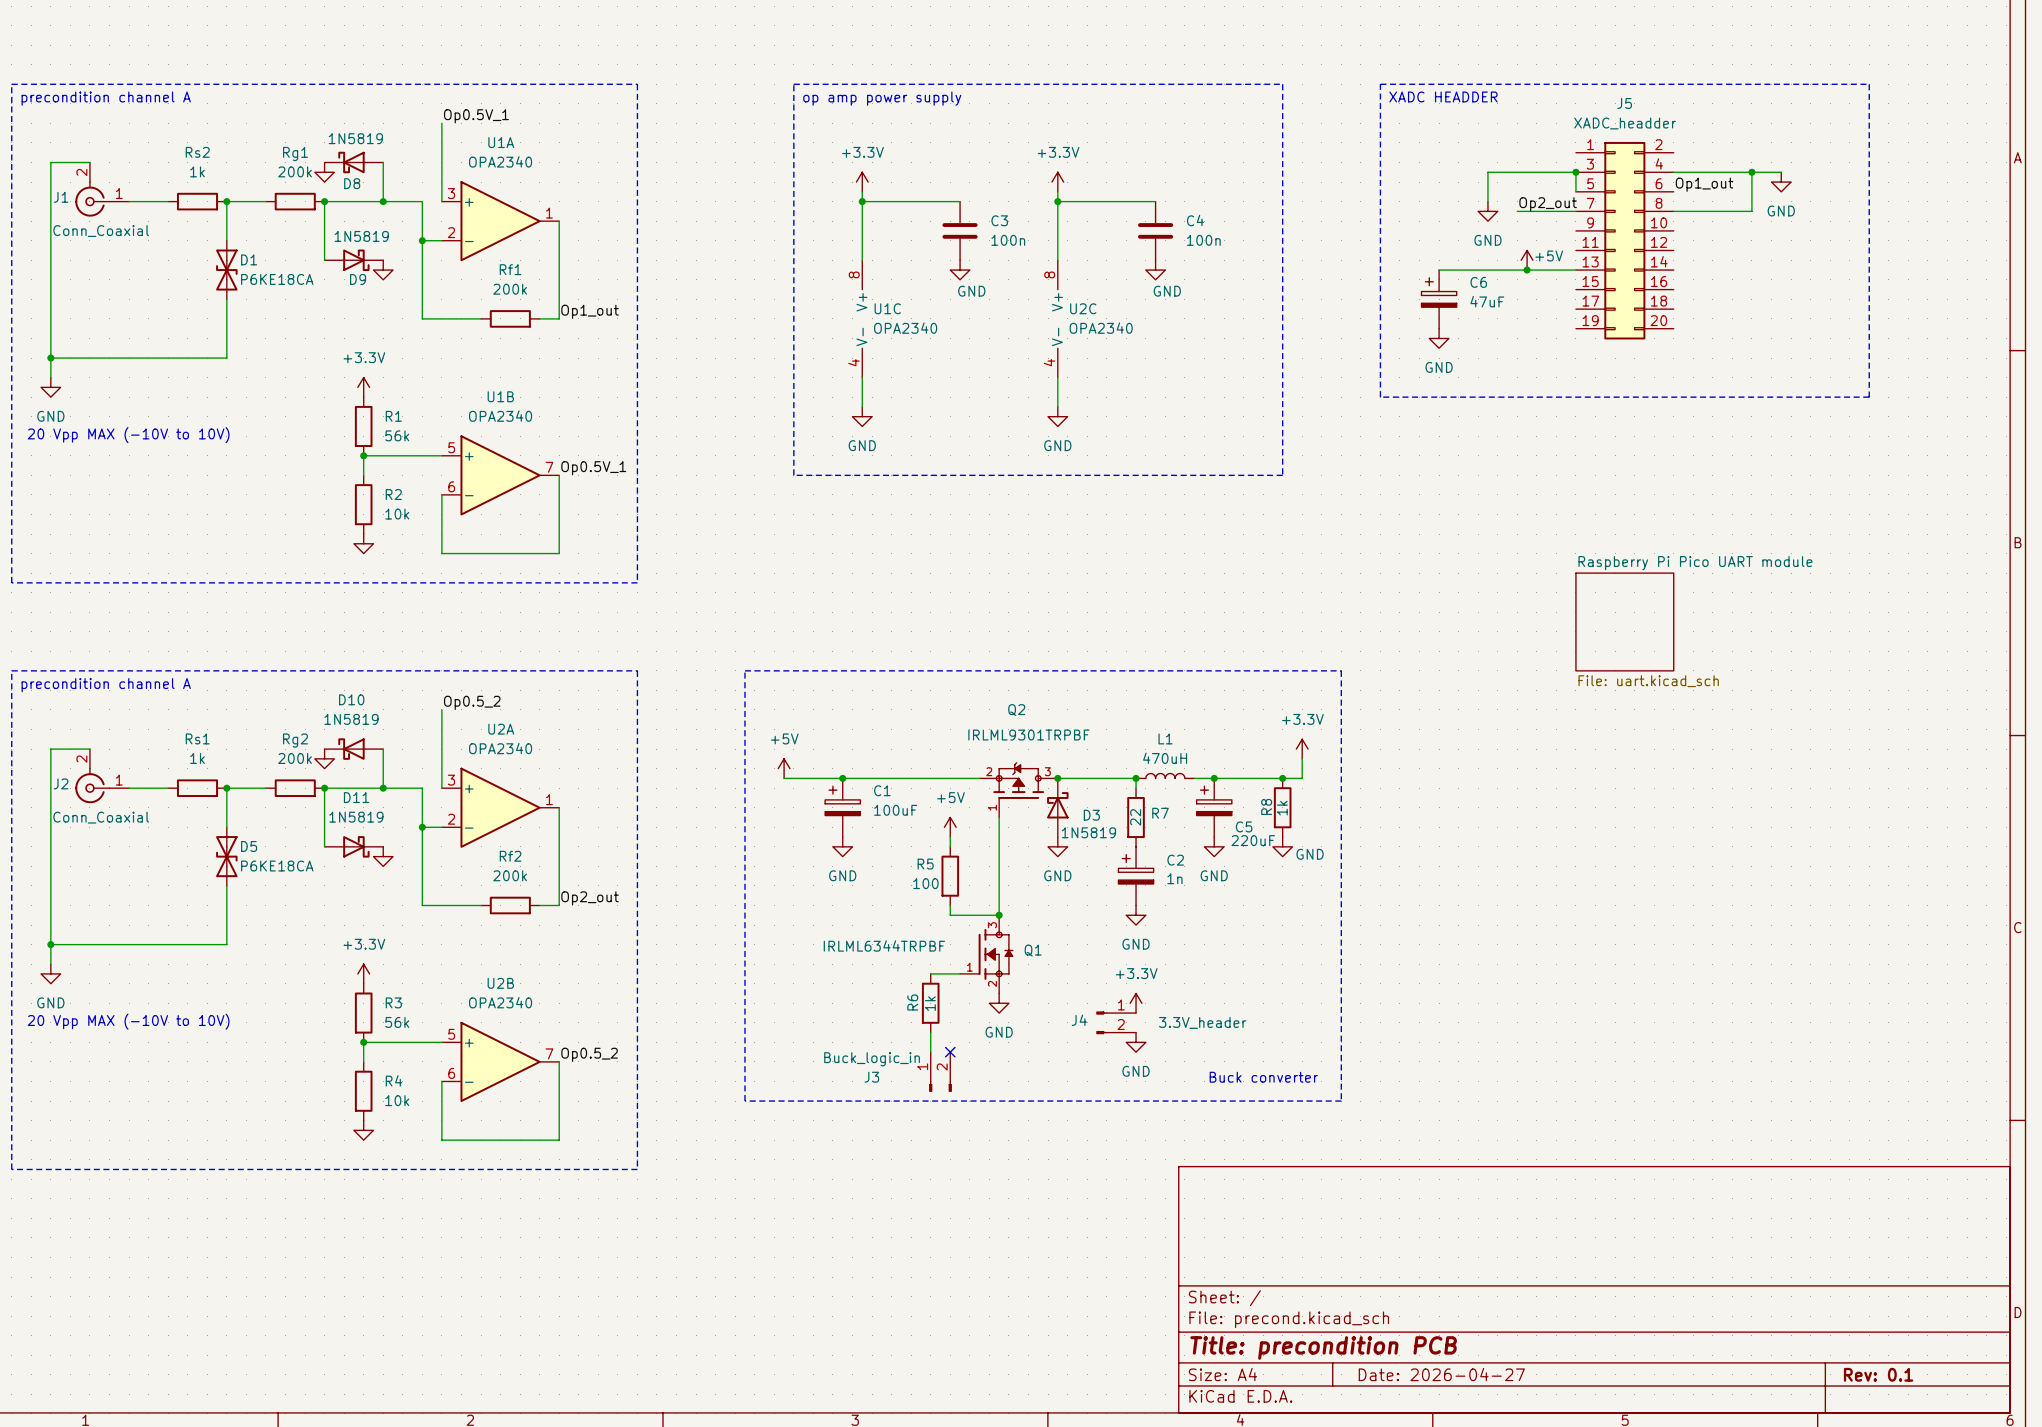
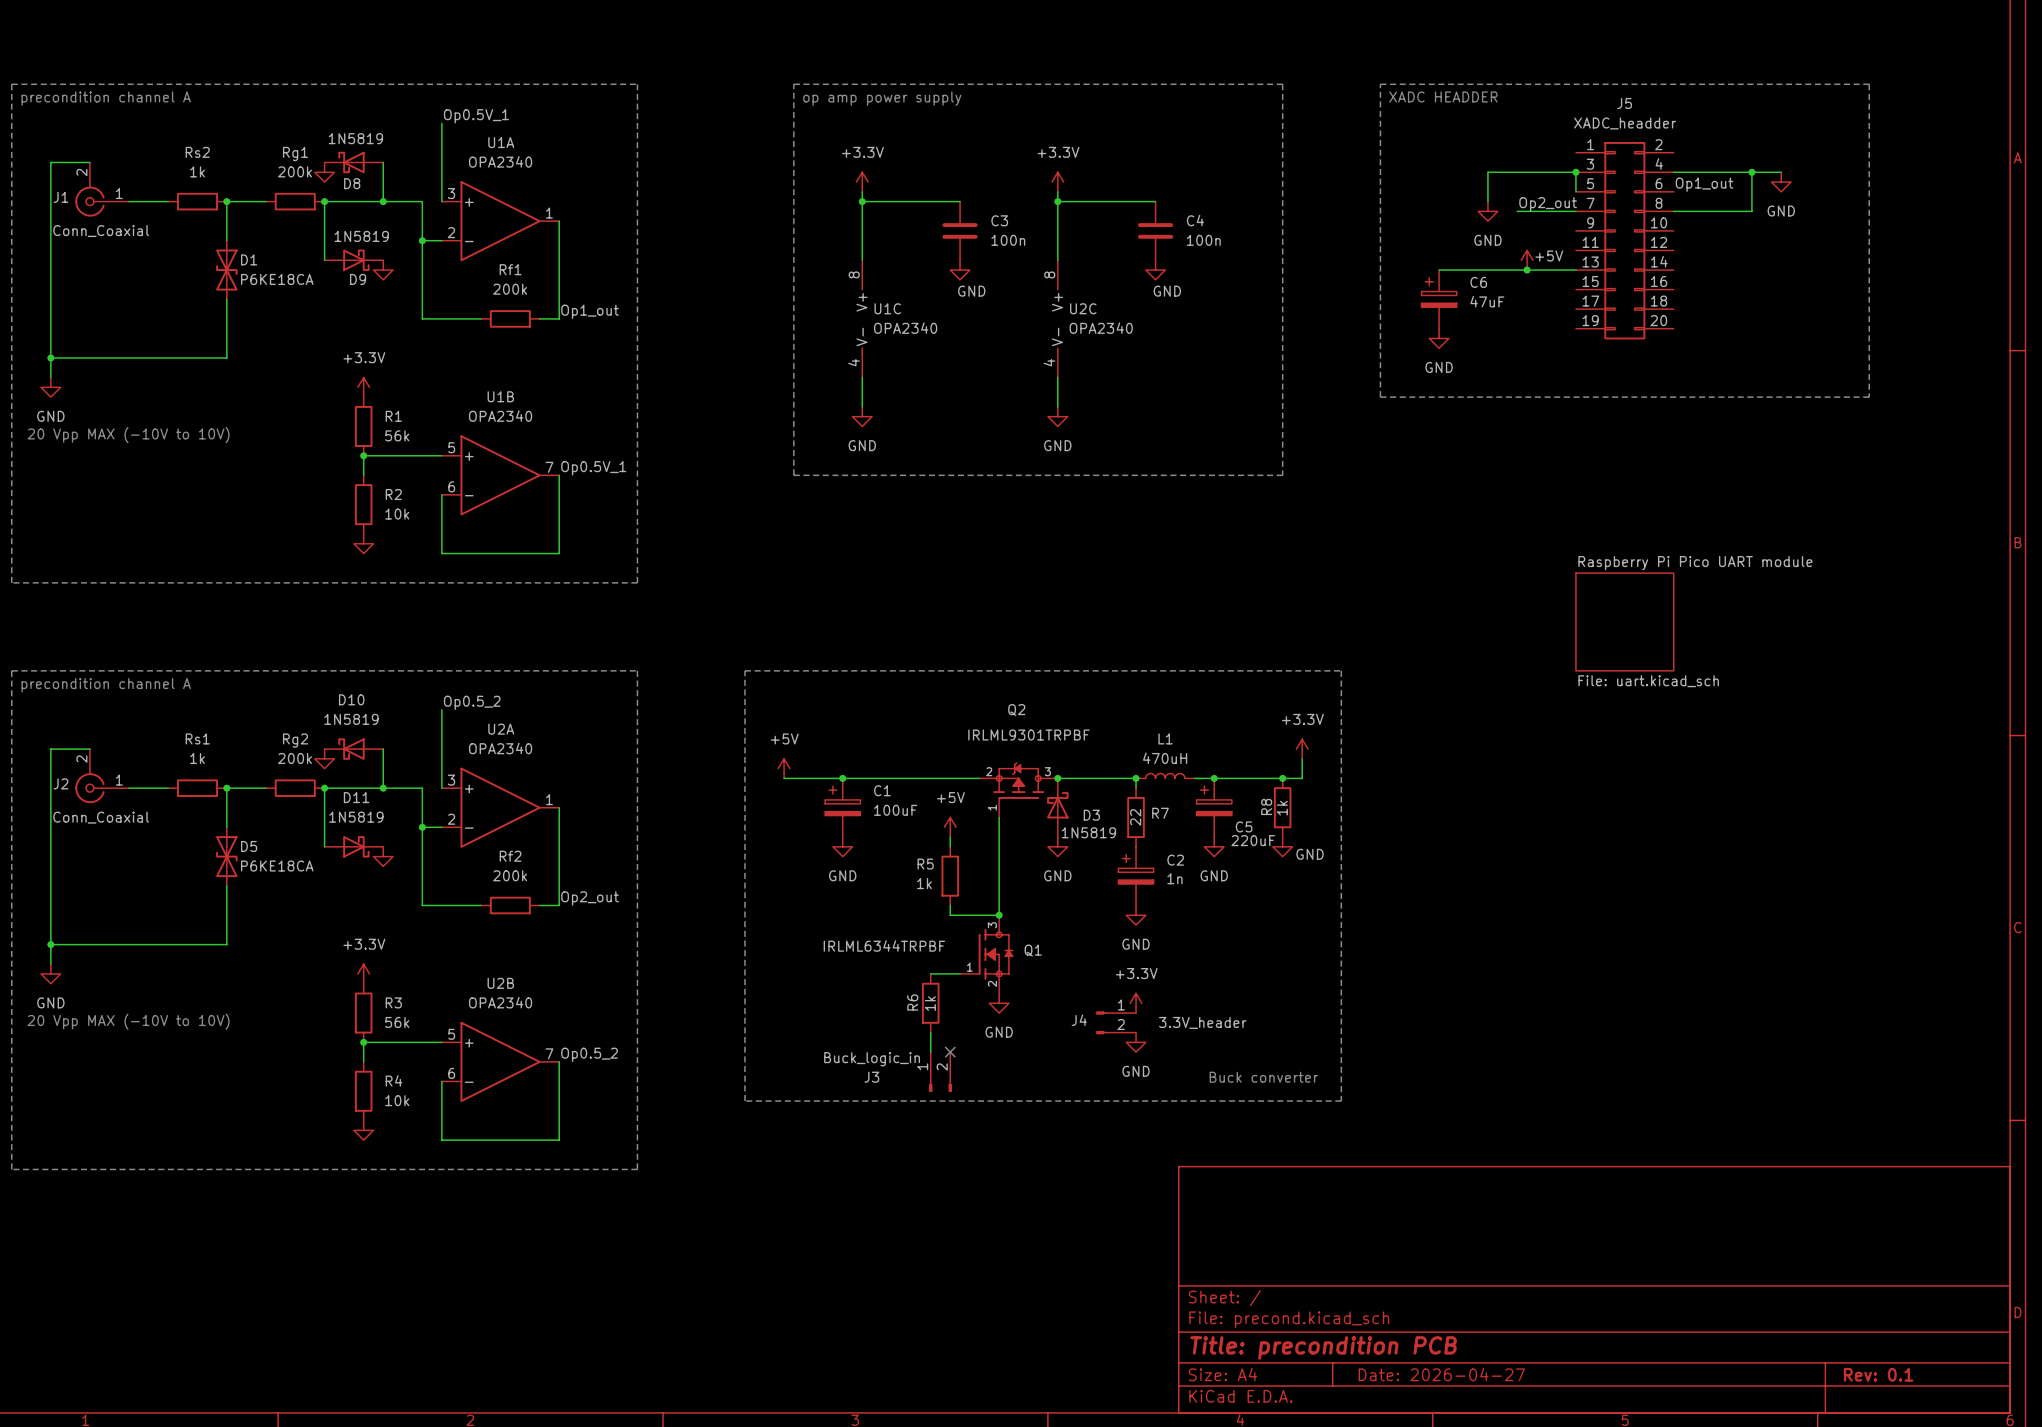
R5 value: 100 (925, 883) -> 1k (924, 883)

